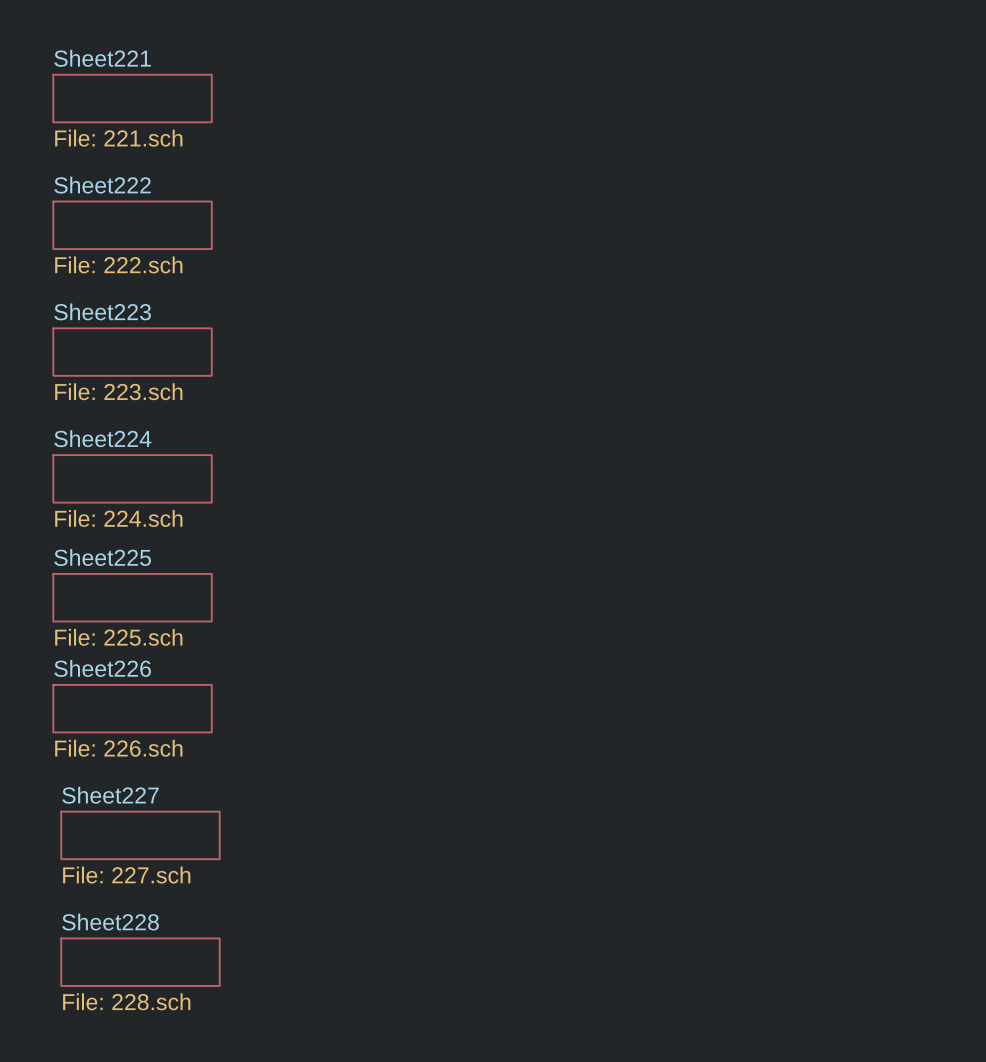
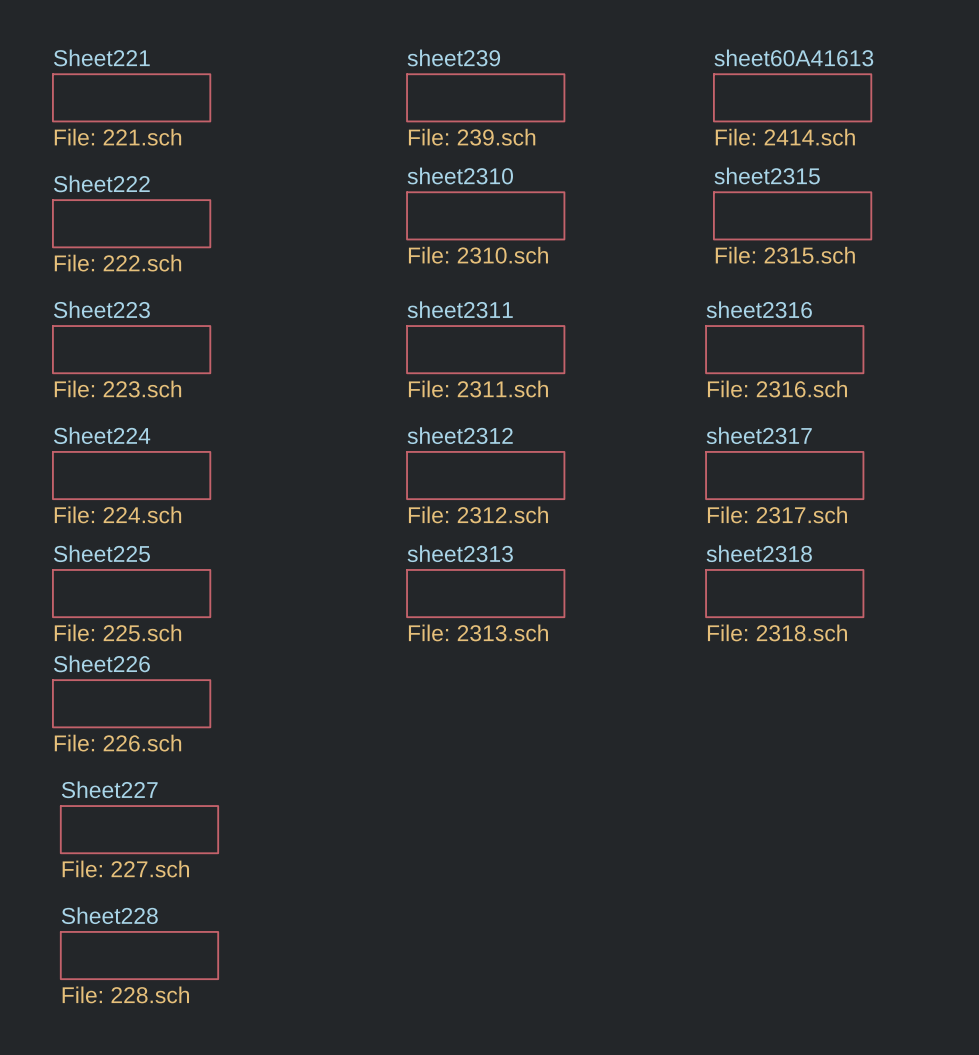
sheet sheet239: none -> File: 239.sch (485, 97)
sheet sheet60A41613: none -> File: 2414.sch (792, 97)
sheet sheet2310: none -> File: 2310.sch (485, 215)
sheet sheet2315: none -> File: 2315.sch (792, 215)
sheet sheet2311: none -> File: 2311.sch (485, 349)
sheet sheet2316: none -> File: 2316.sch (784, 349)
sheet sheet2312: none -> File: 2312.sch (485, 475)
sheet sheet2317: none -> File: 2317.sch (784, 475)
sheet sheet2313: none -> File: 2313.sch (485, 593)
sheet sheet2318: none -> File: 2318.sch (784, 593)

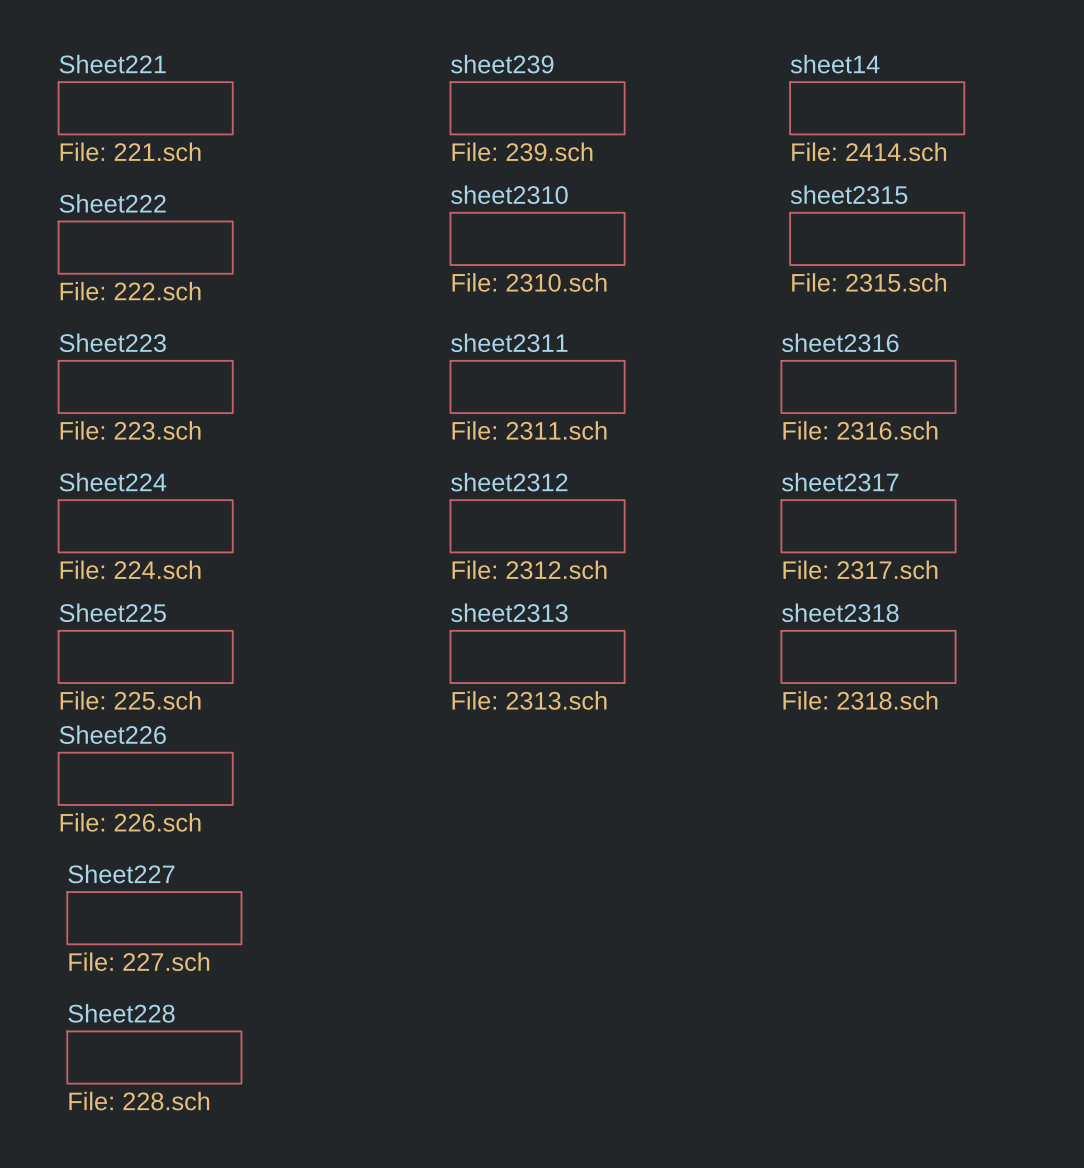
sheet sheet60A41613 name: sheet60A41613 (793, 57) -> sheet14 (835, 64)

